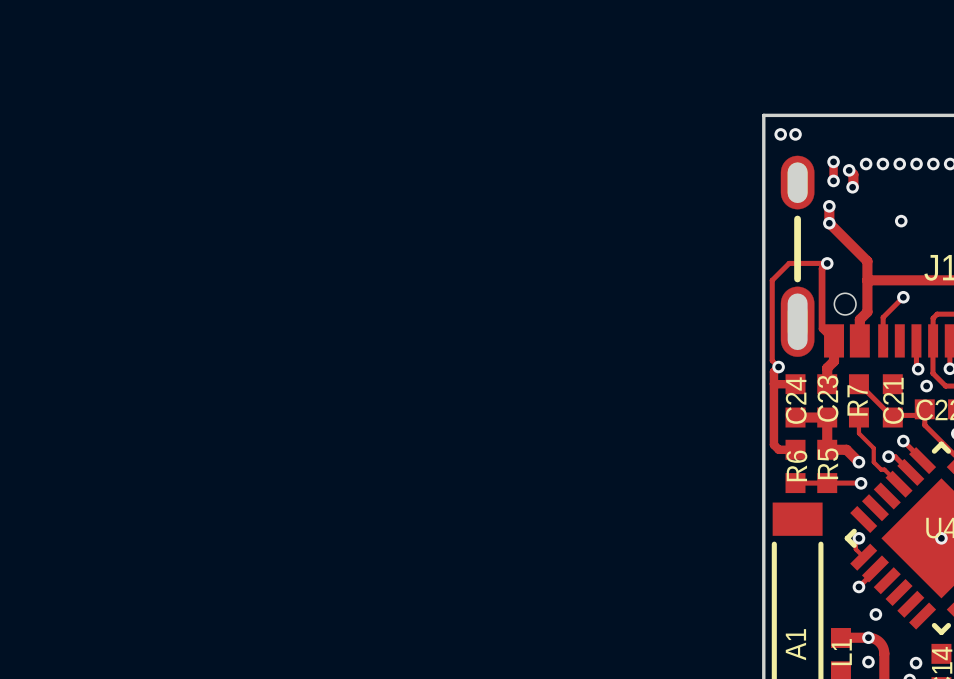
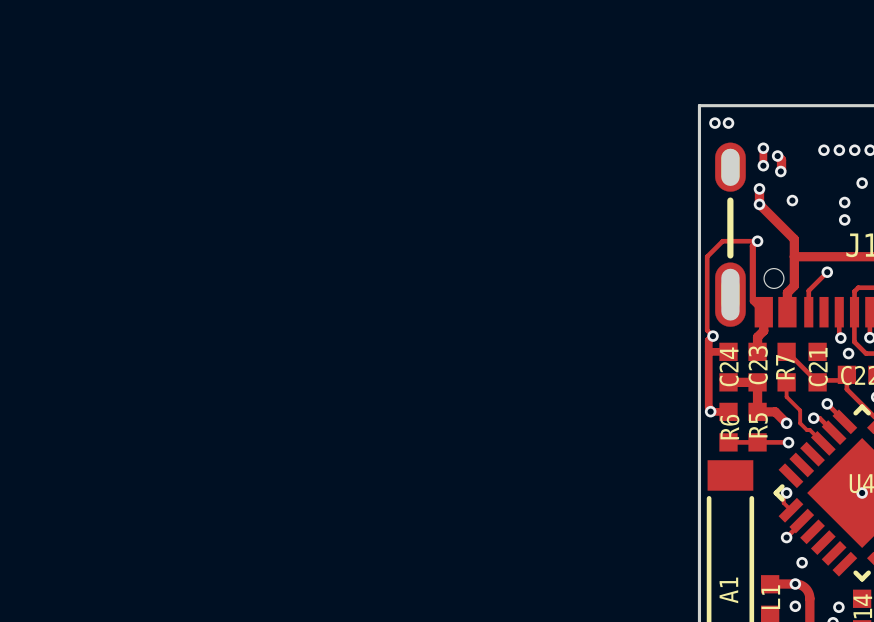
via: (866, 164) -> none
via: (882, 164) -> none
via: none -> (862, 183)
via: none -> (792, 200)
via: (901, 221) -> none
via: none -> (844, 202)
via: none -> (844, 219)
via: none -> (710, 411)

